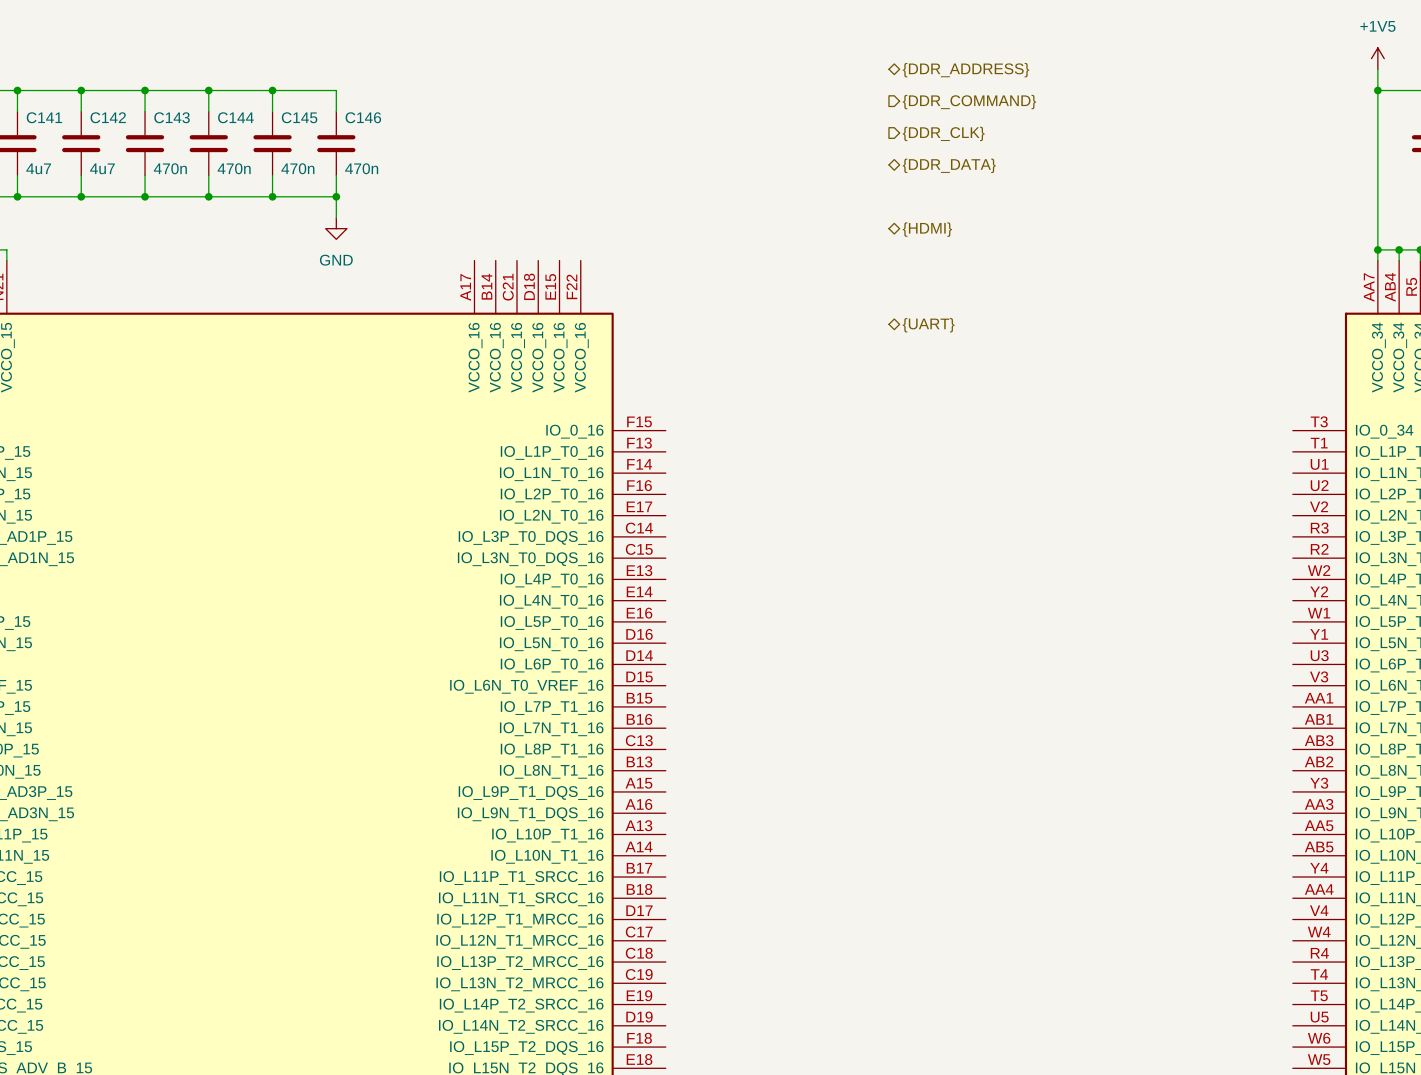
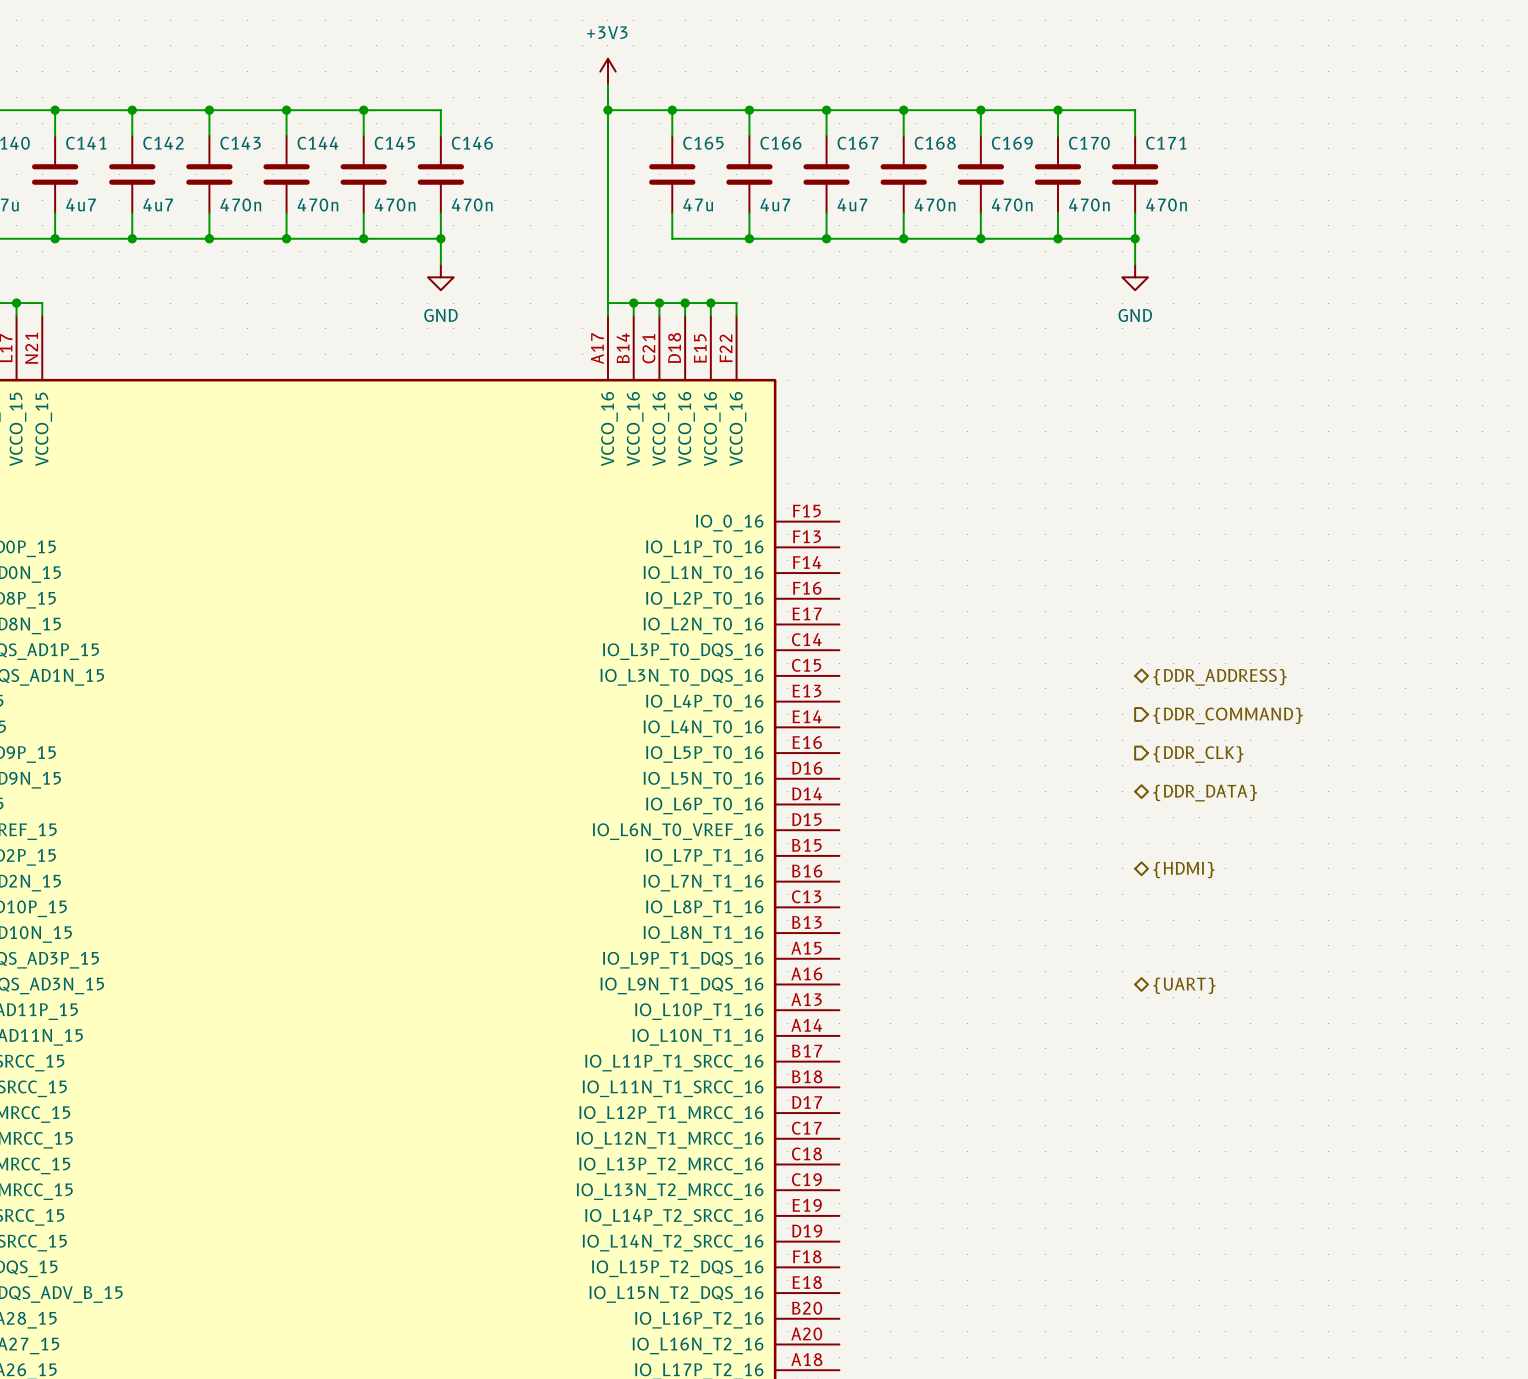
power symbol: none -> +3V3 (607, 71)
wire: none -> (607, 84) (607, 315)
hierarchical label: {DDR_ADDRESS} (966, 70) -> none
wire: none -> (607, 110) (1135, 110) (1135, 135)
junction: none -> (607, 110)
wire: none -> (672, 110) (672, 135)
junction: none -> (672, 110)
wire: none -> (749, 110) (749, 135)
junction: none -> (749, 110)
wire: none -> (826, 110) (826, 135)
junction: none -> (826, 110)
wire: none -> (903, 110) (903, 135)
junction: none -> (903, 110)
wire: none -> (980, 110) (980, 135)
junction: none -> (980, 110)
wire: none -> (1057, 110) (1057, 135)
junction: none -> (1057, 110)
hierarchical label: {DDR_COMMAND} (969, 102) -> none
hierarchical label: {DDR_CLK} (943, 133) -> none
C165: none -> 47u (672, 174)
C166: none -> 4u7 (749, 174)
C167: none -> 4u7 (826, 174)
C168: none -> 470n (903, 174)
C169: none -> 470n (980, 174)
C170: none -> 470n (1057, 174)
C171: none -> 470n (1135, 174)
hierarchical label: {DDR_DATA} (949, 165) -> none
wire: none -> (672, 213) (672, 238) (1135, 238)
wire: none -> (749, 213) (749, 238)
wire: none -> (826, 213) (826, 238)
wire: none -> (903, 213) (903, 238)
wire: none -> (980, 213) (980, 238)
wire: none -> (1057, 213) (1057, 238)
wire: none -> (1135, 213) (1135, 264)
junction: none -> (749, 238)
junction: none -> (826, 238)
junction: none -> (903, 238)
junction: none -> (980, 238)
junction: none -> (1057, 238)
junction: none -> (1135, 238)
power symbol: none -> GND (1135, 277)
hierarchical label: {HDMI} (927, 229) -> none
wire: none -> (607, 303) (736, 303) (736, 315)
wire: none -> (633, 303) (633, 315)
junction: none -> (633, 303)
wire: none -> (659, 303) (659, 315)
junction: none -> (659, 303)
wire: none -> (685, 303) (685, 315)
junction: none -> (685, 303)
wire: none -> (710, 303) (710, 315)
junction: none -> (710, 303)
hierarchical label: {UART} (928, 325) -> none
hierarchical label: none -> {DDR_ADDRESS} (1219, 677)
hierarchical label: none -> {DDR_COMMAND} (1228, 715)
hierarchical label: none -> {DDR_CLK} (1198, 754)
hierarchical label: none -> {DDR_DATA} (1205, 793)
hierarchical label: none -> {HDMI} (1184, 870)
hierarchical label: none -> {UART} (1184, 985)

